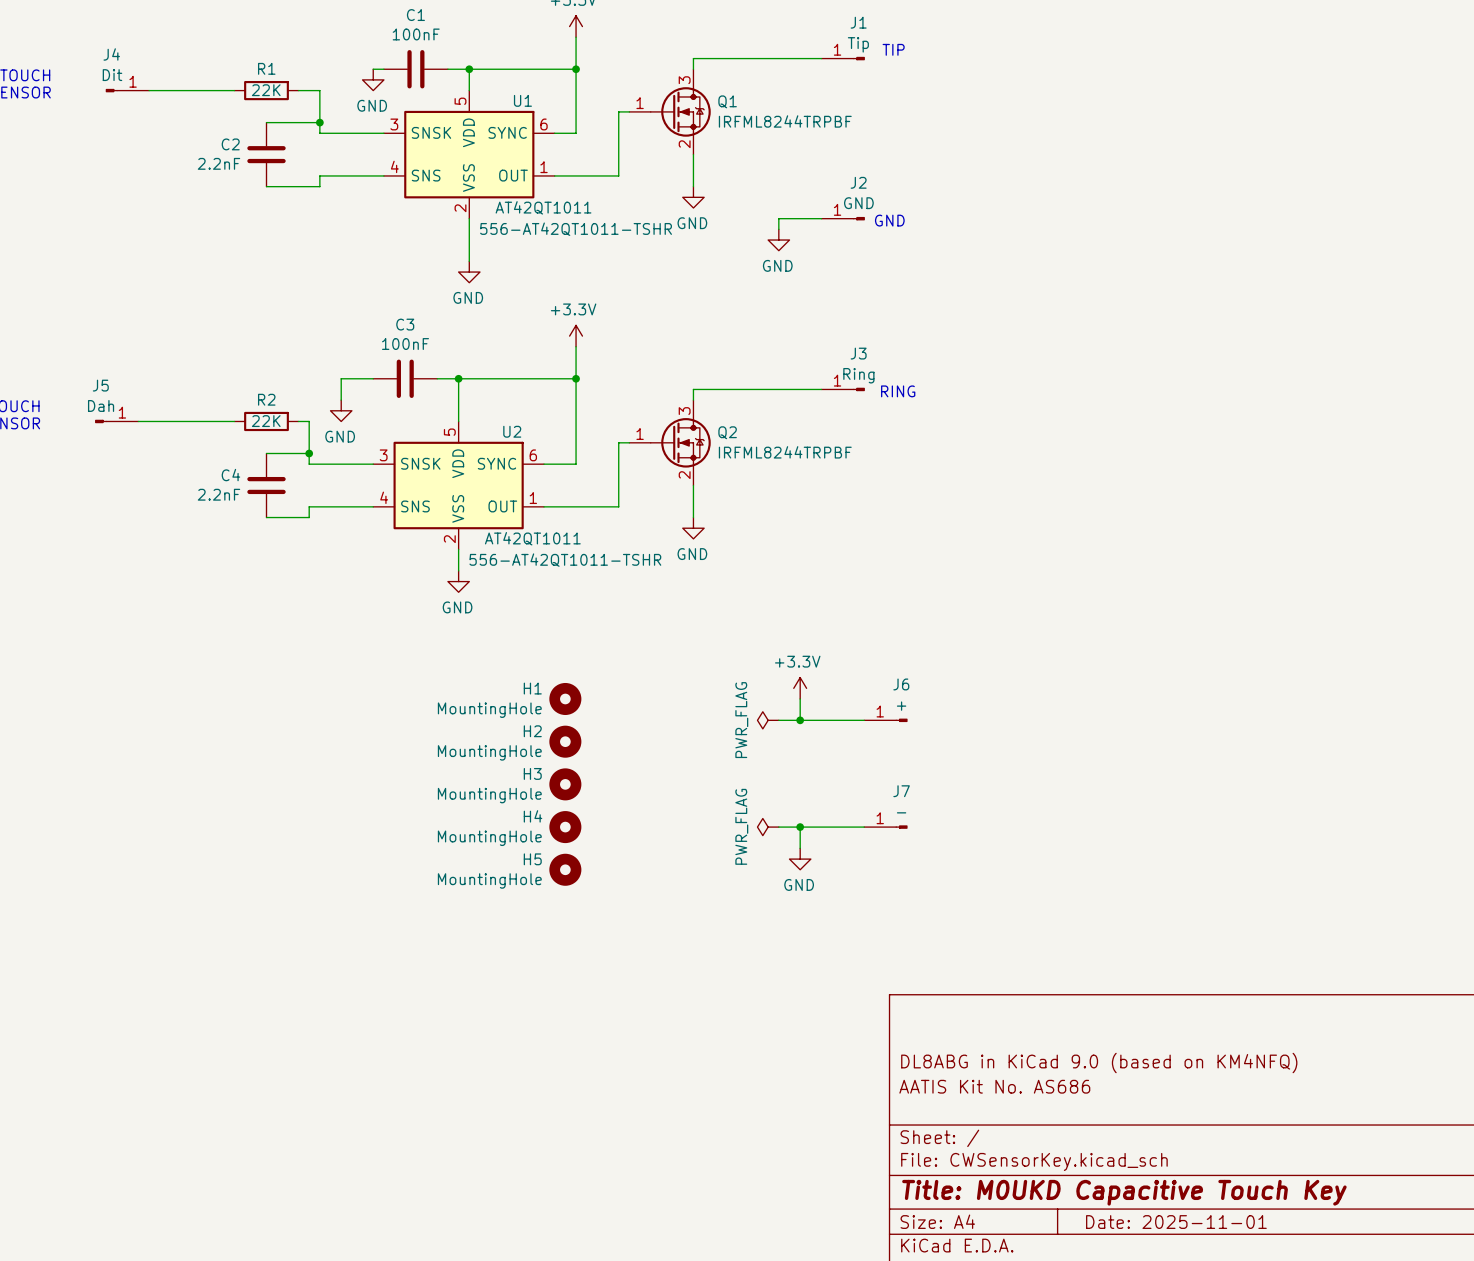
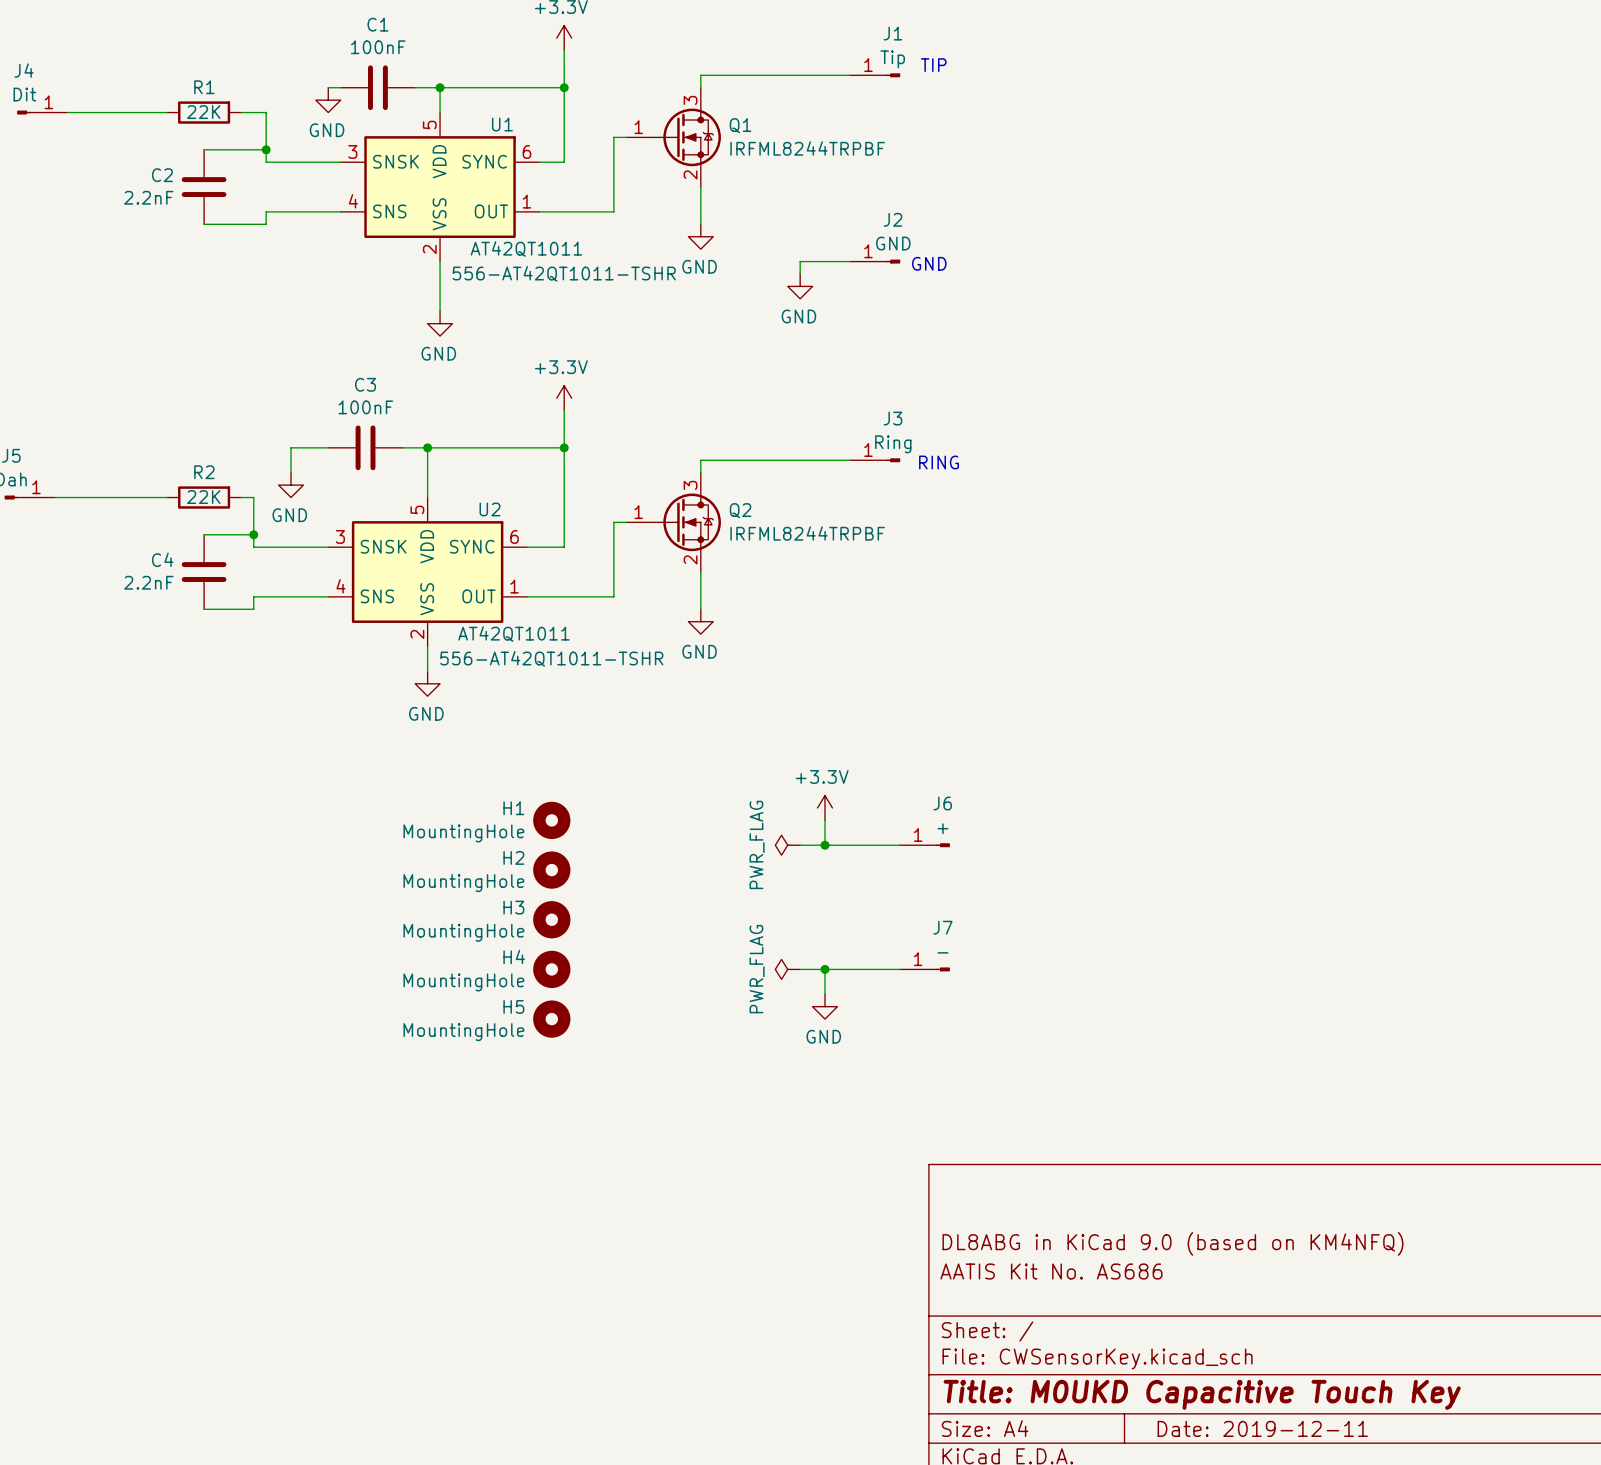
title block: Date: 2025-11-01 (1176, 1222) -> Date: 2019-12-11 (1262, 1428)

